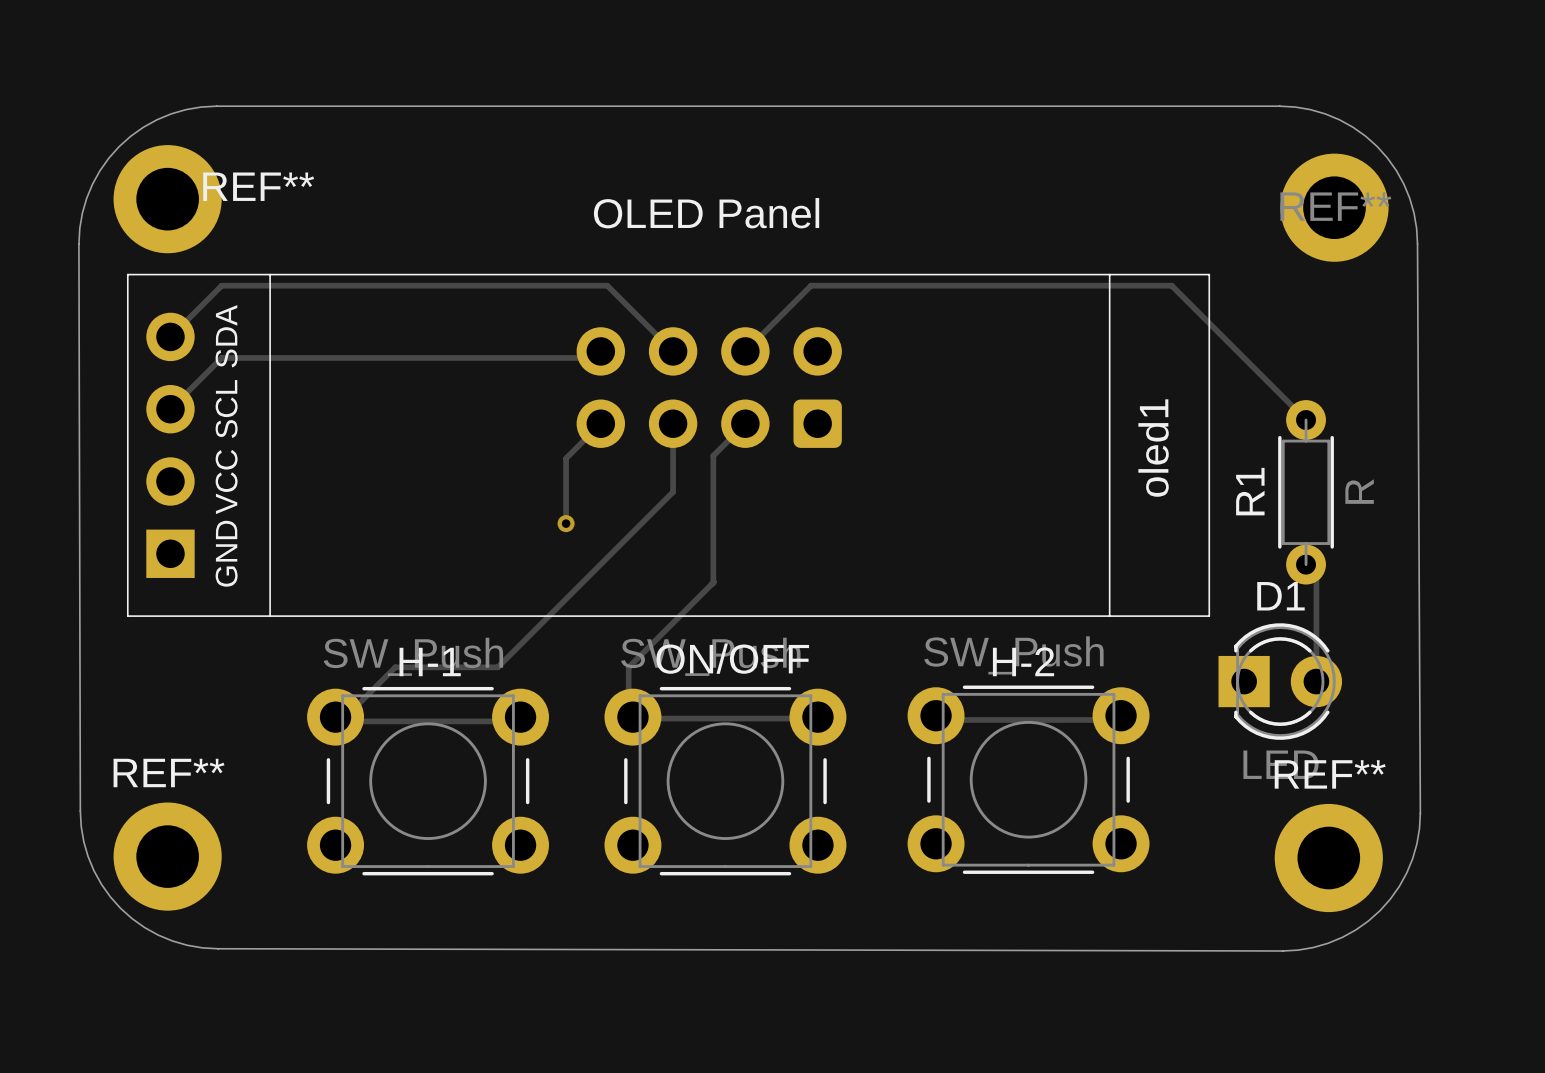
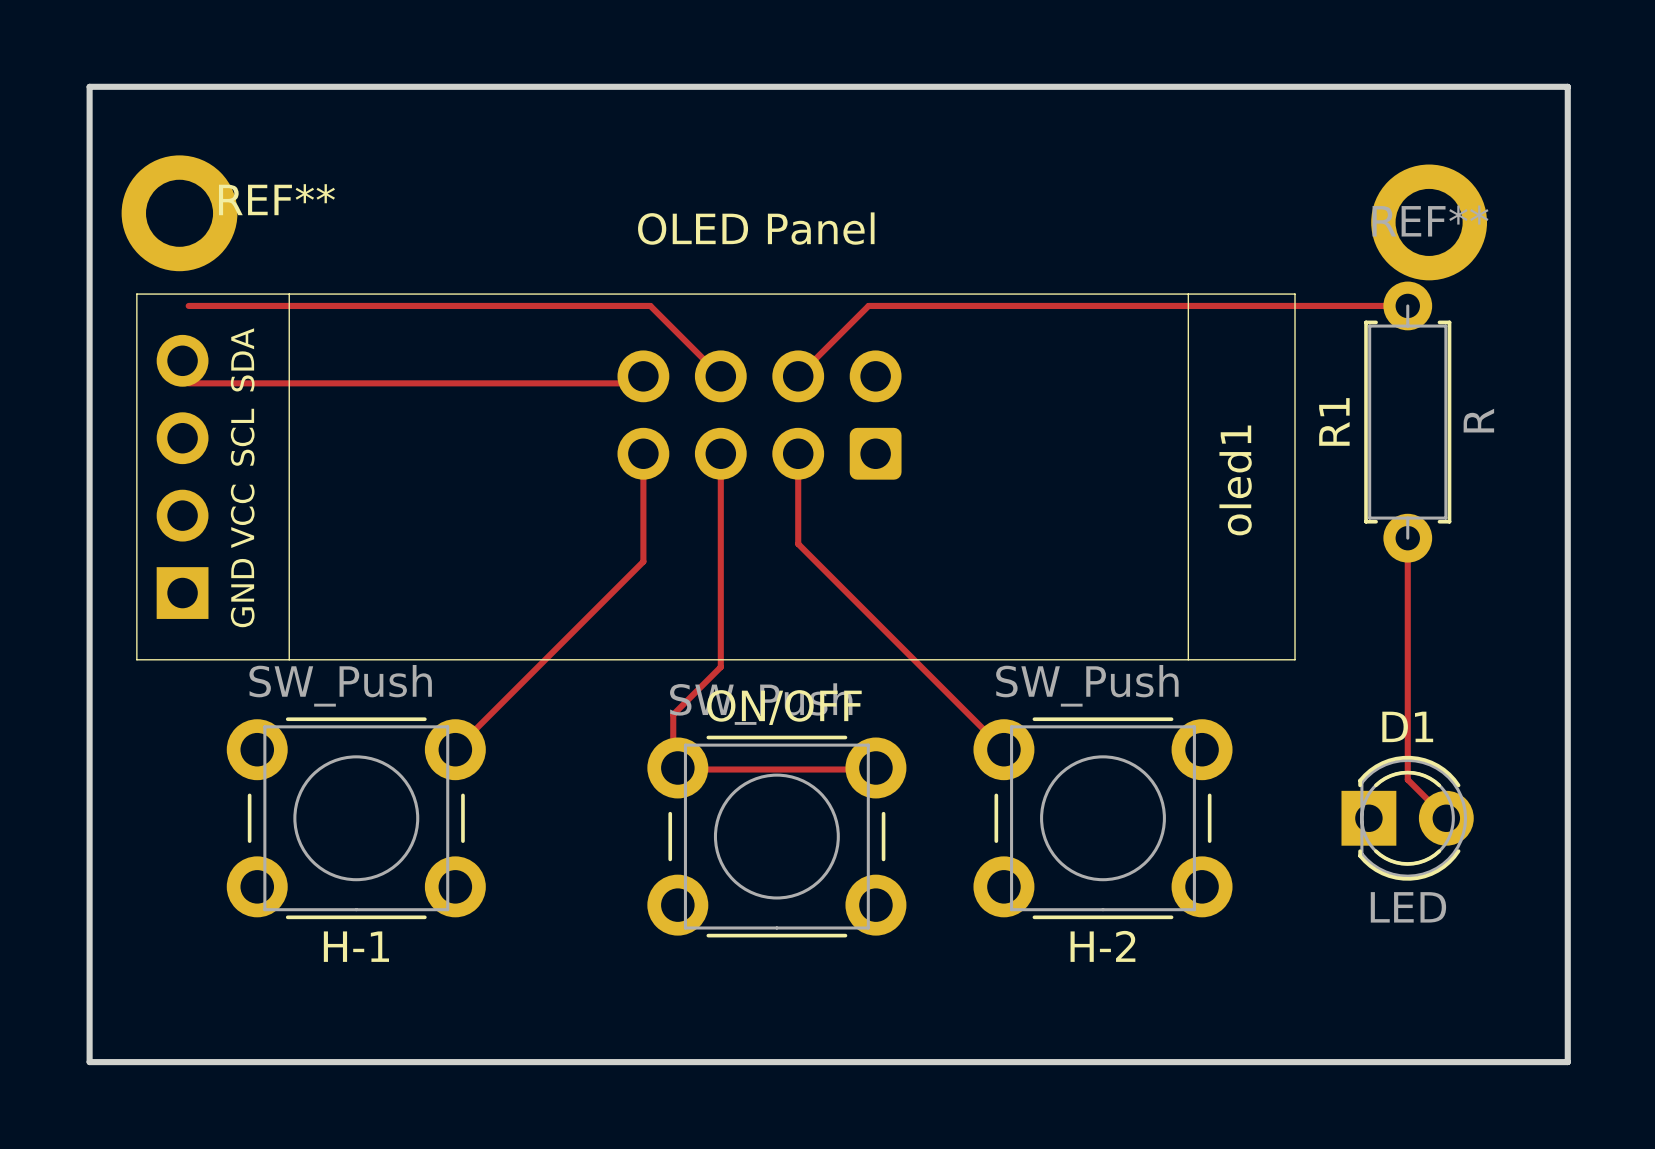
board edge: (216, 106) (1279, 106) (1310, 109) (1339, 119) (1353, 127) (1377, 146) (1396, 170) (1409, 198) (1416, 228) (1420, 813) (1416, 843) (1412, 858) (1399, 886) (1390, 899) (1368, 920) (1342, 937) (1313, 947) (1282, 951) (218, 948) (187, 945) (158, 935) (144, 927) (120, 908) (101, 884) (88, 856) (81, 826) (79, 228) (82, 213) (92, 184) (108, 158) (119, 146) (130, 136) (156, 119) (185, 109) (216, 106) -> (89, 86) (89, 1062) (1567, 1062) (1567, 86) (89, 86)
track: (221, 285) (170, 336) -> (237, 305) (188, 305)
track: (1171, 285) (1306, 420) -> (1254, 305) (1407, 305)
track: (221, 357) (170, 409) -> (237, 383) (188, 383)
R1 footprint: [1278, 400, 1334, 585] -> [1364, 281, 1452, 563]
track: (600, 423) (566, 458) (566, 523) -> (643, 453) (643, 561) (455, 749)
track: (745, 423) (713, 455) (713, 582) -> (798, 453) (798, 543) (1003, 749)
track: (673, 492) (497, 667) (395, 667) (345, 717) (335, 717) (339, 721) (516, 721) (520, 717) -> none
track: none -> (1407, 538) (1407, 779) (1446, 818)
via: (566, 523) -> none
track: (1306, 564) (1316, 574) (1316, 681) -> none
track: (714, 581) (673, 622) -> (720, 526) (720, 667)
H-2 name position: H-2 (1023, 661) -> H-2 (1102, 946)
H-1 name position: H-1 (430, 662) -> H-1 (356, 946)
D1 position: (1280, 681) -> (1407, 818)
track: (937, 700) (936, 715) (940, 719) (1116, 719) (1121, 715) -> none
H-2 position: (1028, 779) -> (1103, 818)
H-1 position: (428, 781) -> (356, 818)
REF**: (167, 856) -> none
REF**: (1328, 858) -> none

